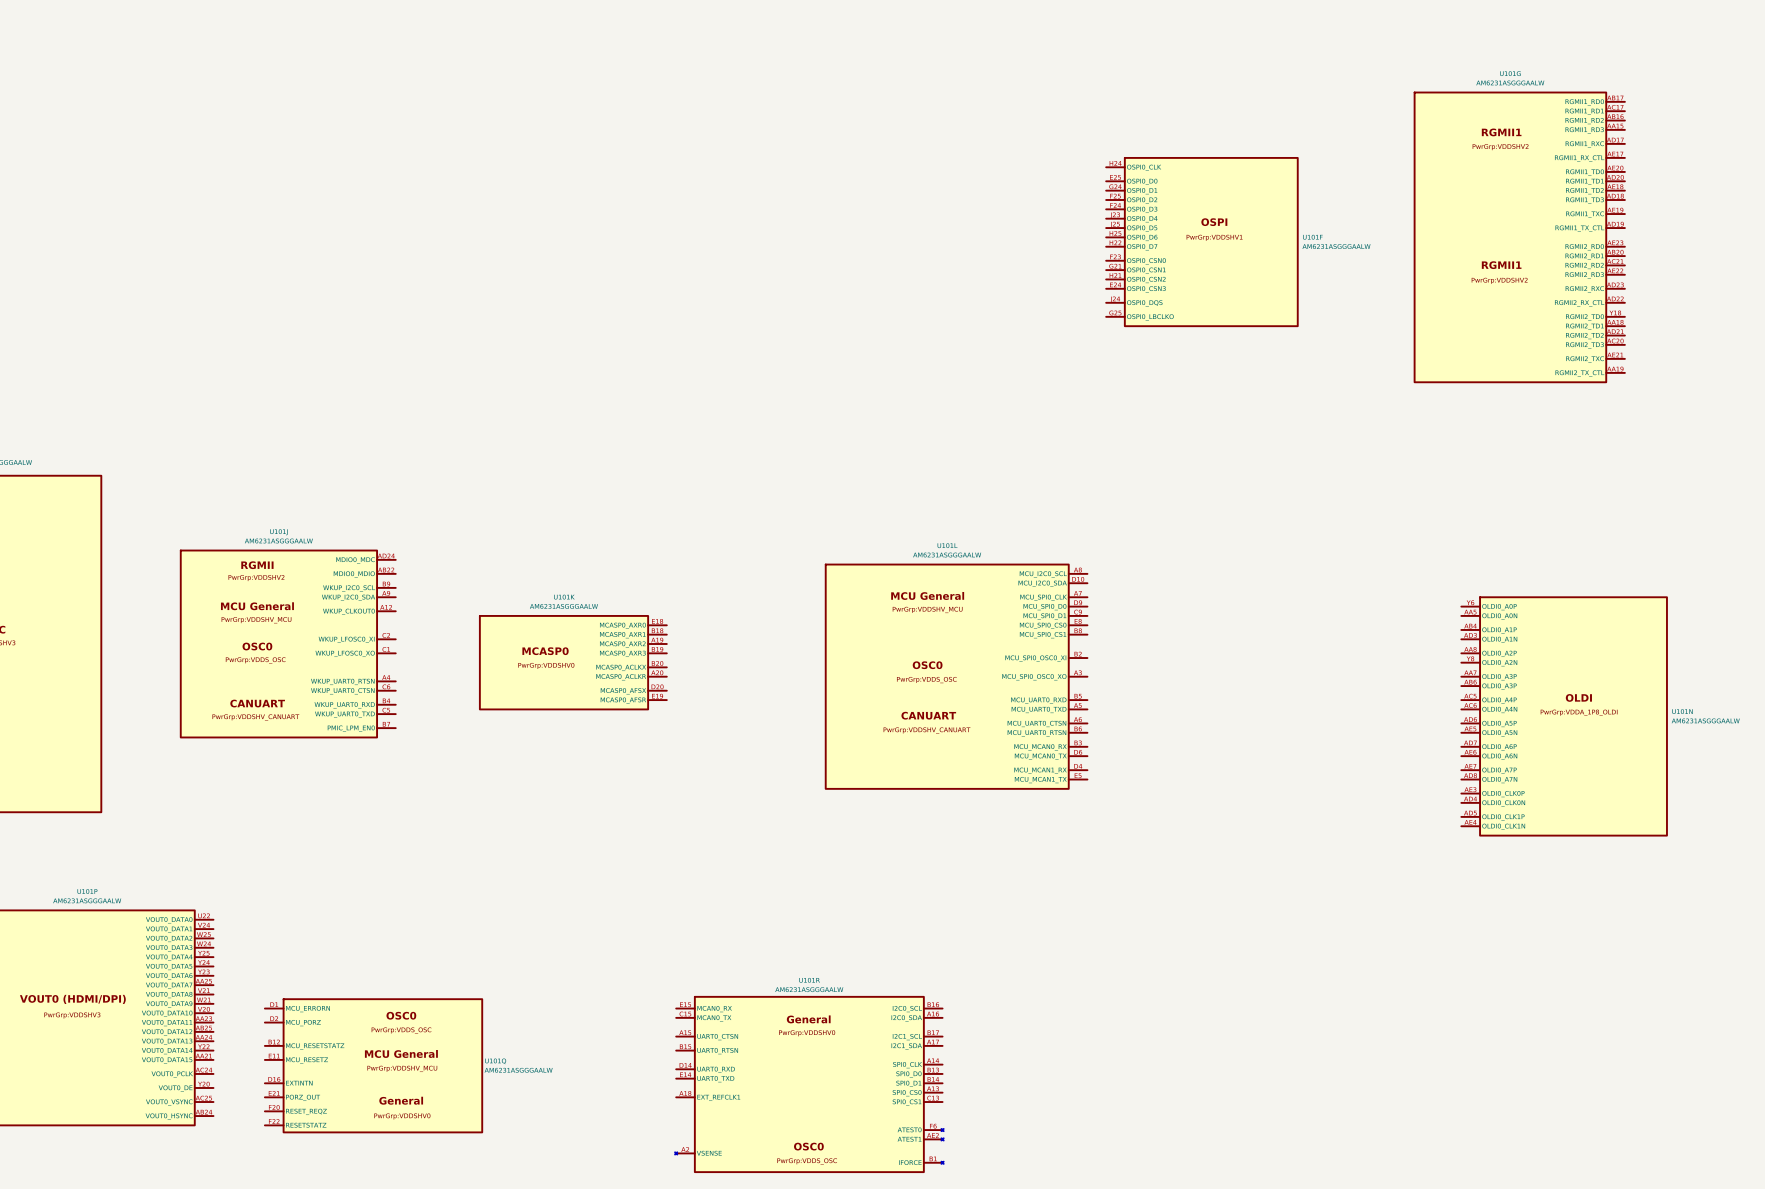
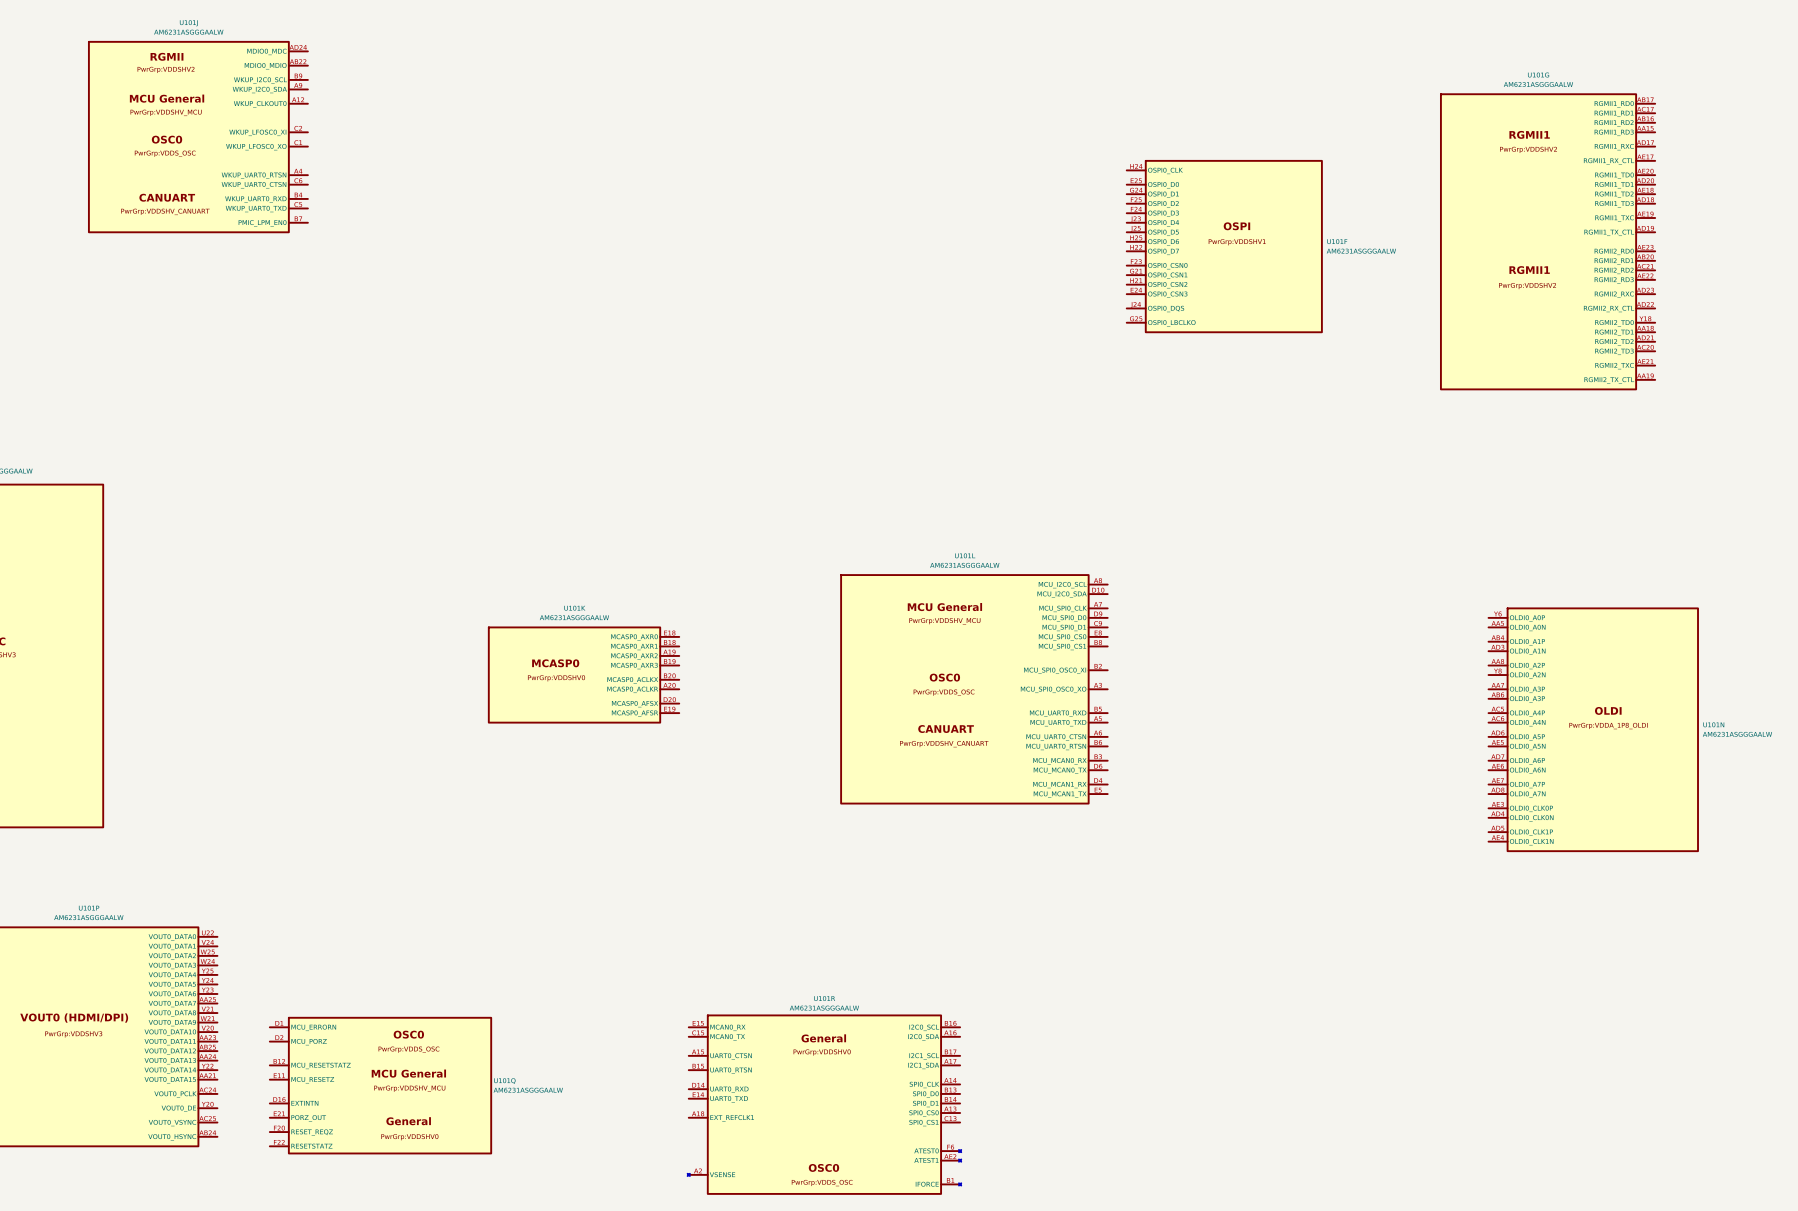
part position: (288, 643) -> (198, 137)

